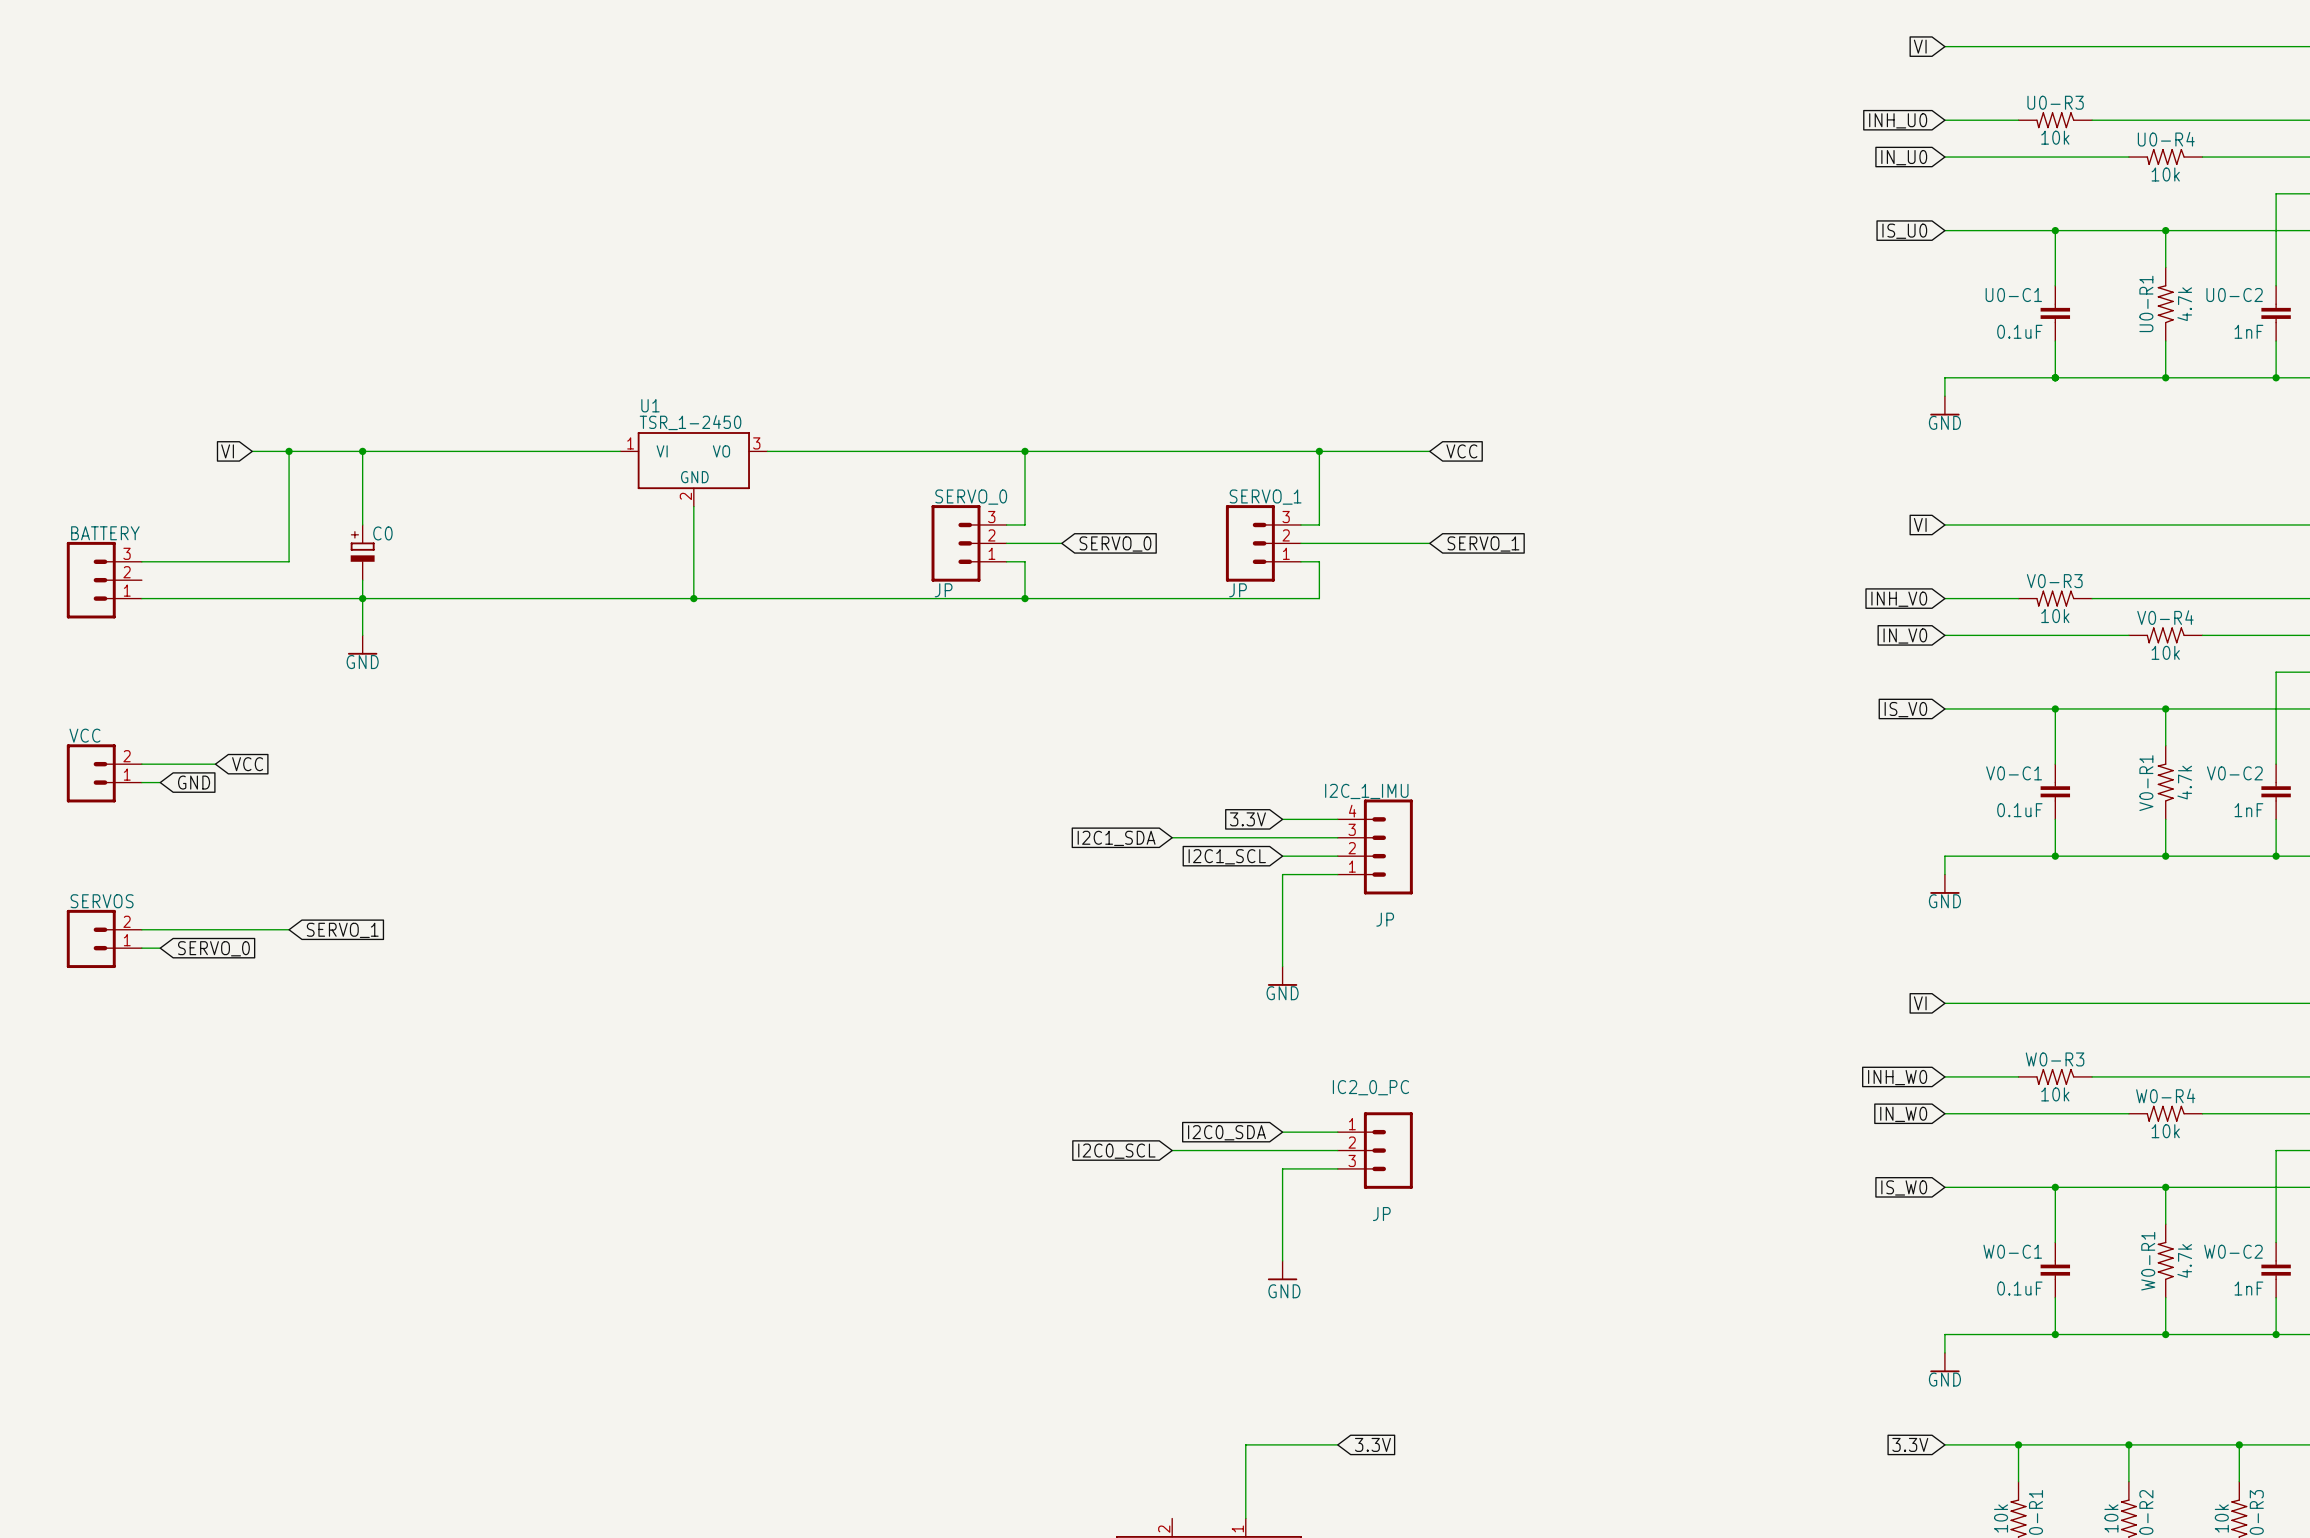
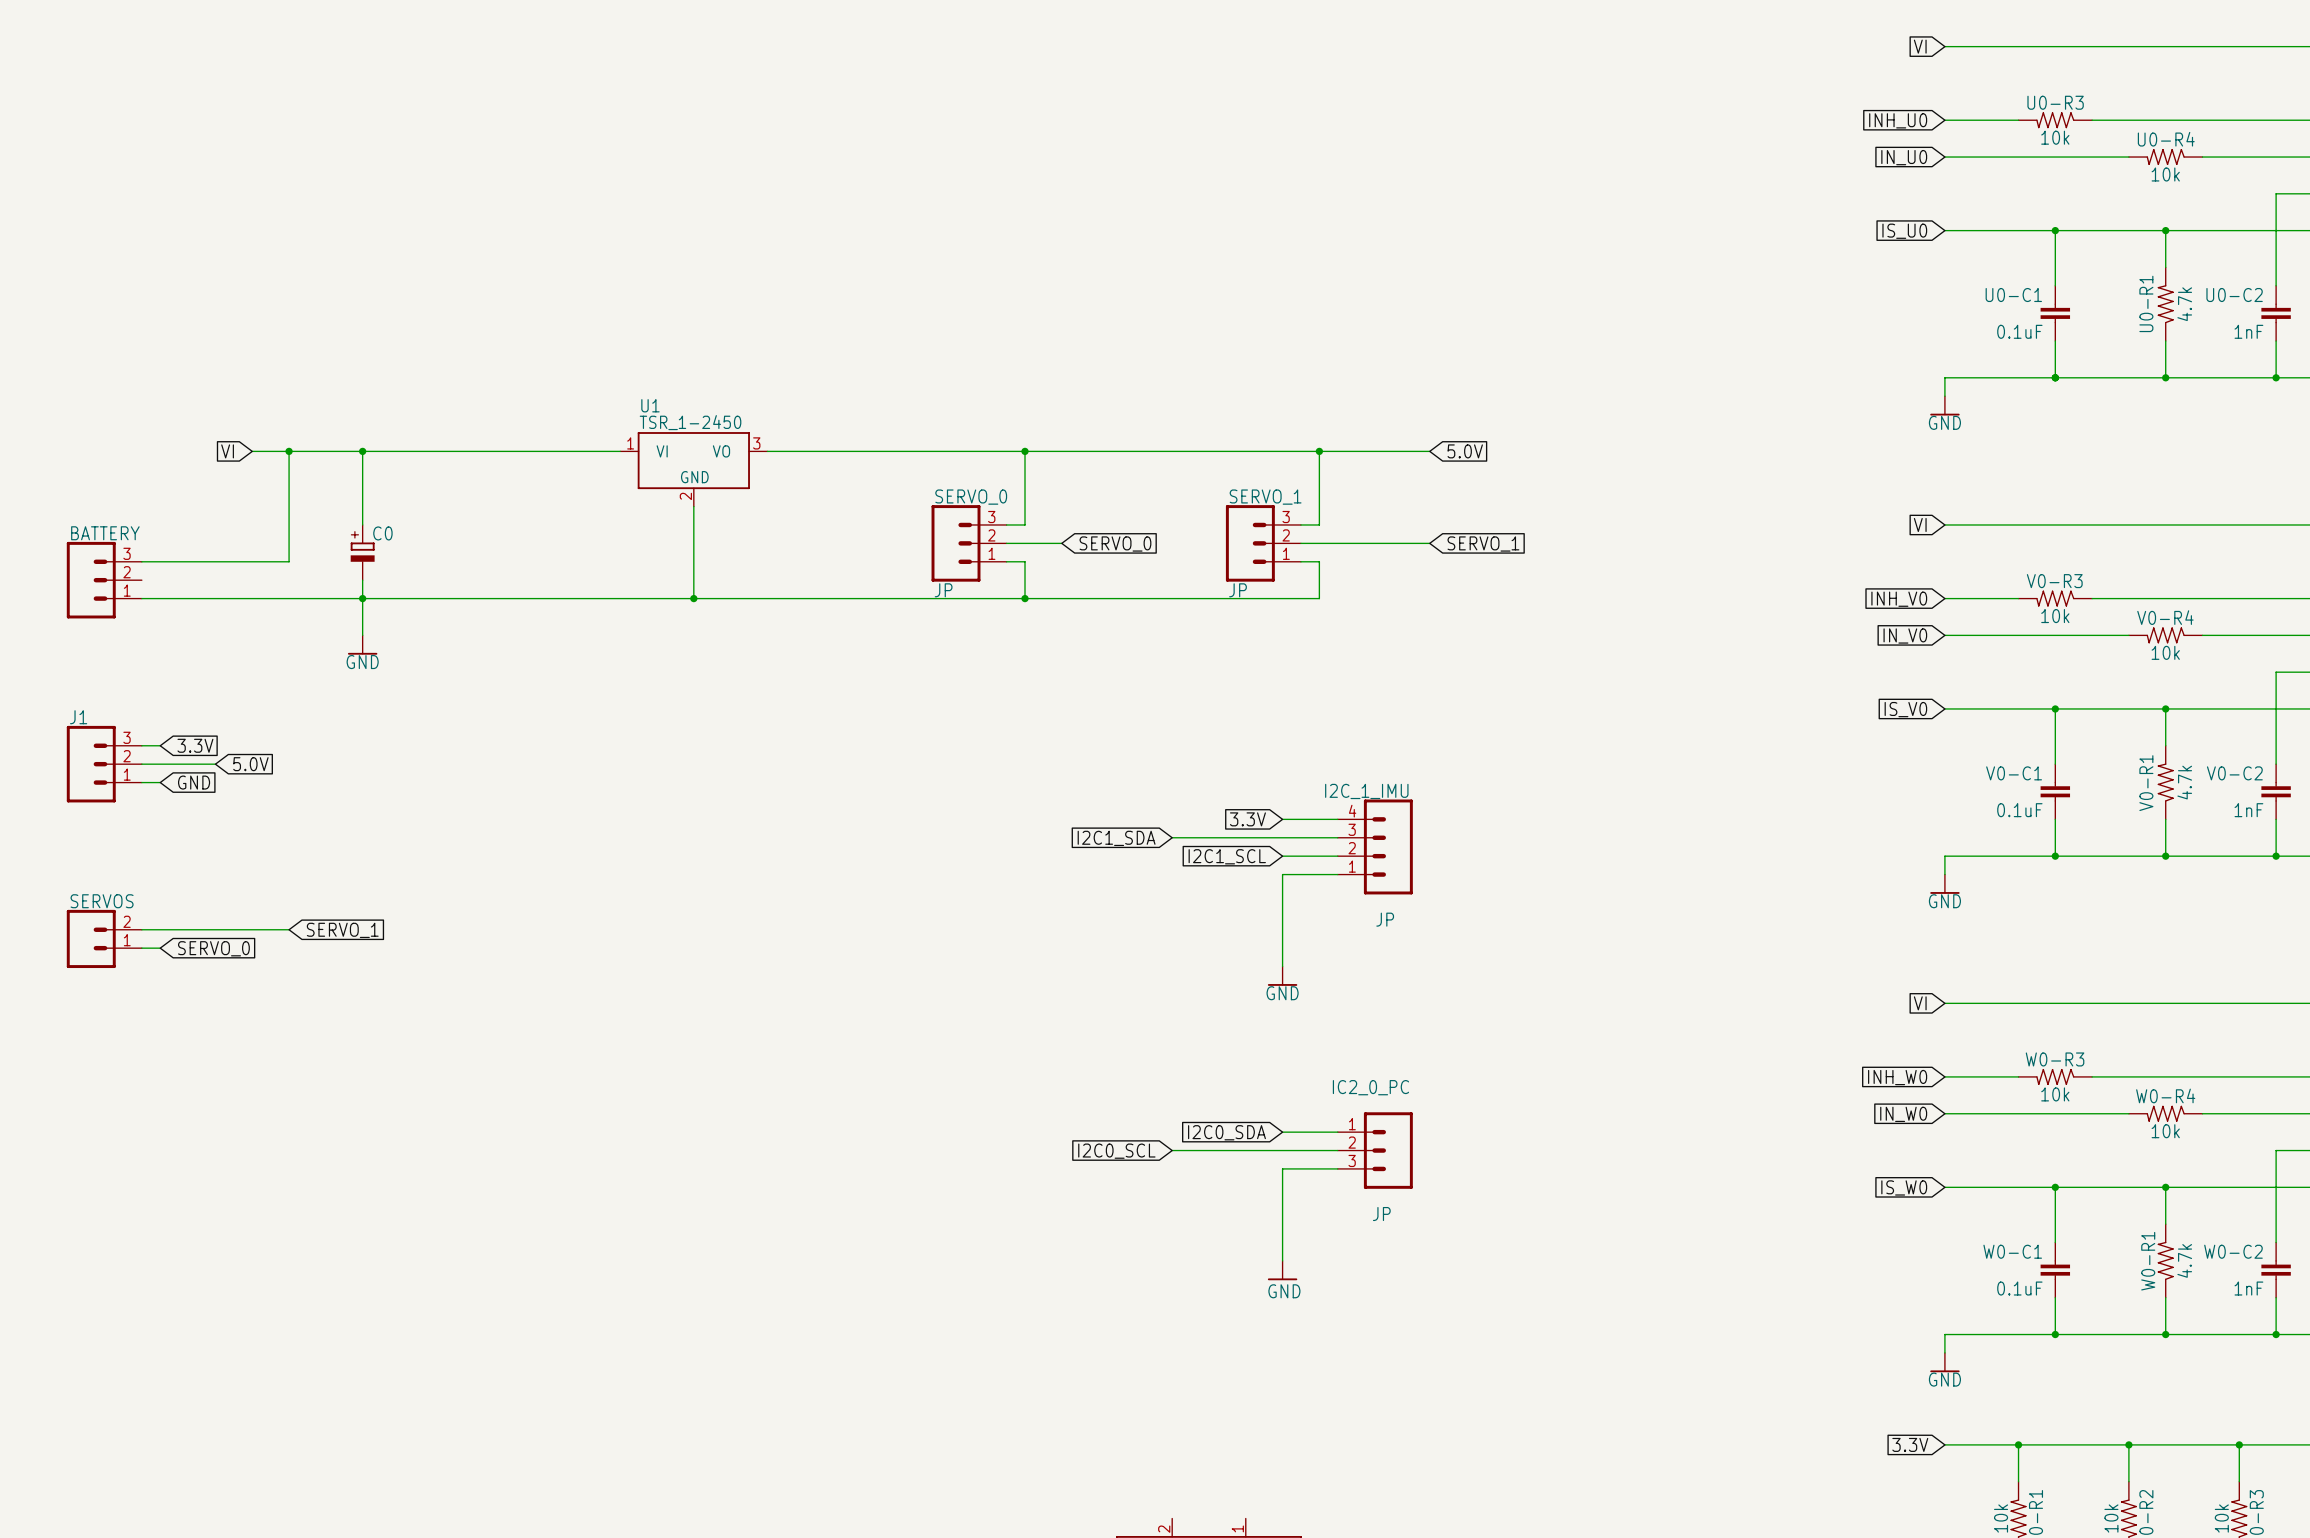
global label: VCC (1461, 451) -> 5.0V (1465, 451)
wire: none -> (141, 745) (160, 745)
global label: none -> 3.3V (195, 745)
J1: none -> (104, 764)
global label: VCC (247, 764) -> 5.0V (250, 764)
VCC: (104, 773) -> none
wire: (1337, 1444) (1245, 1444) (1245, 1518) -> none
global label: 3.3V (1372, 1444) -> none

